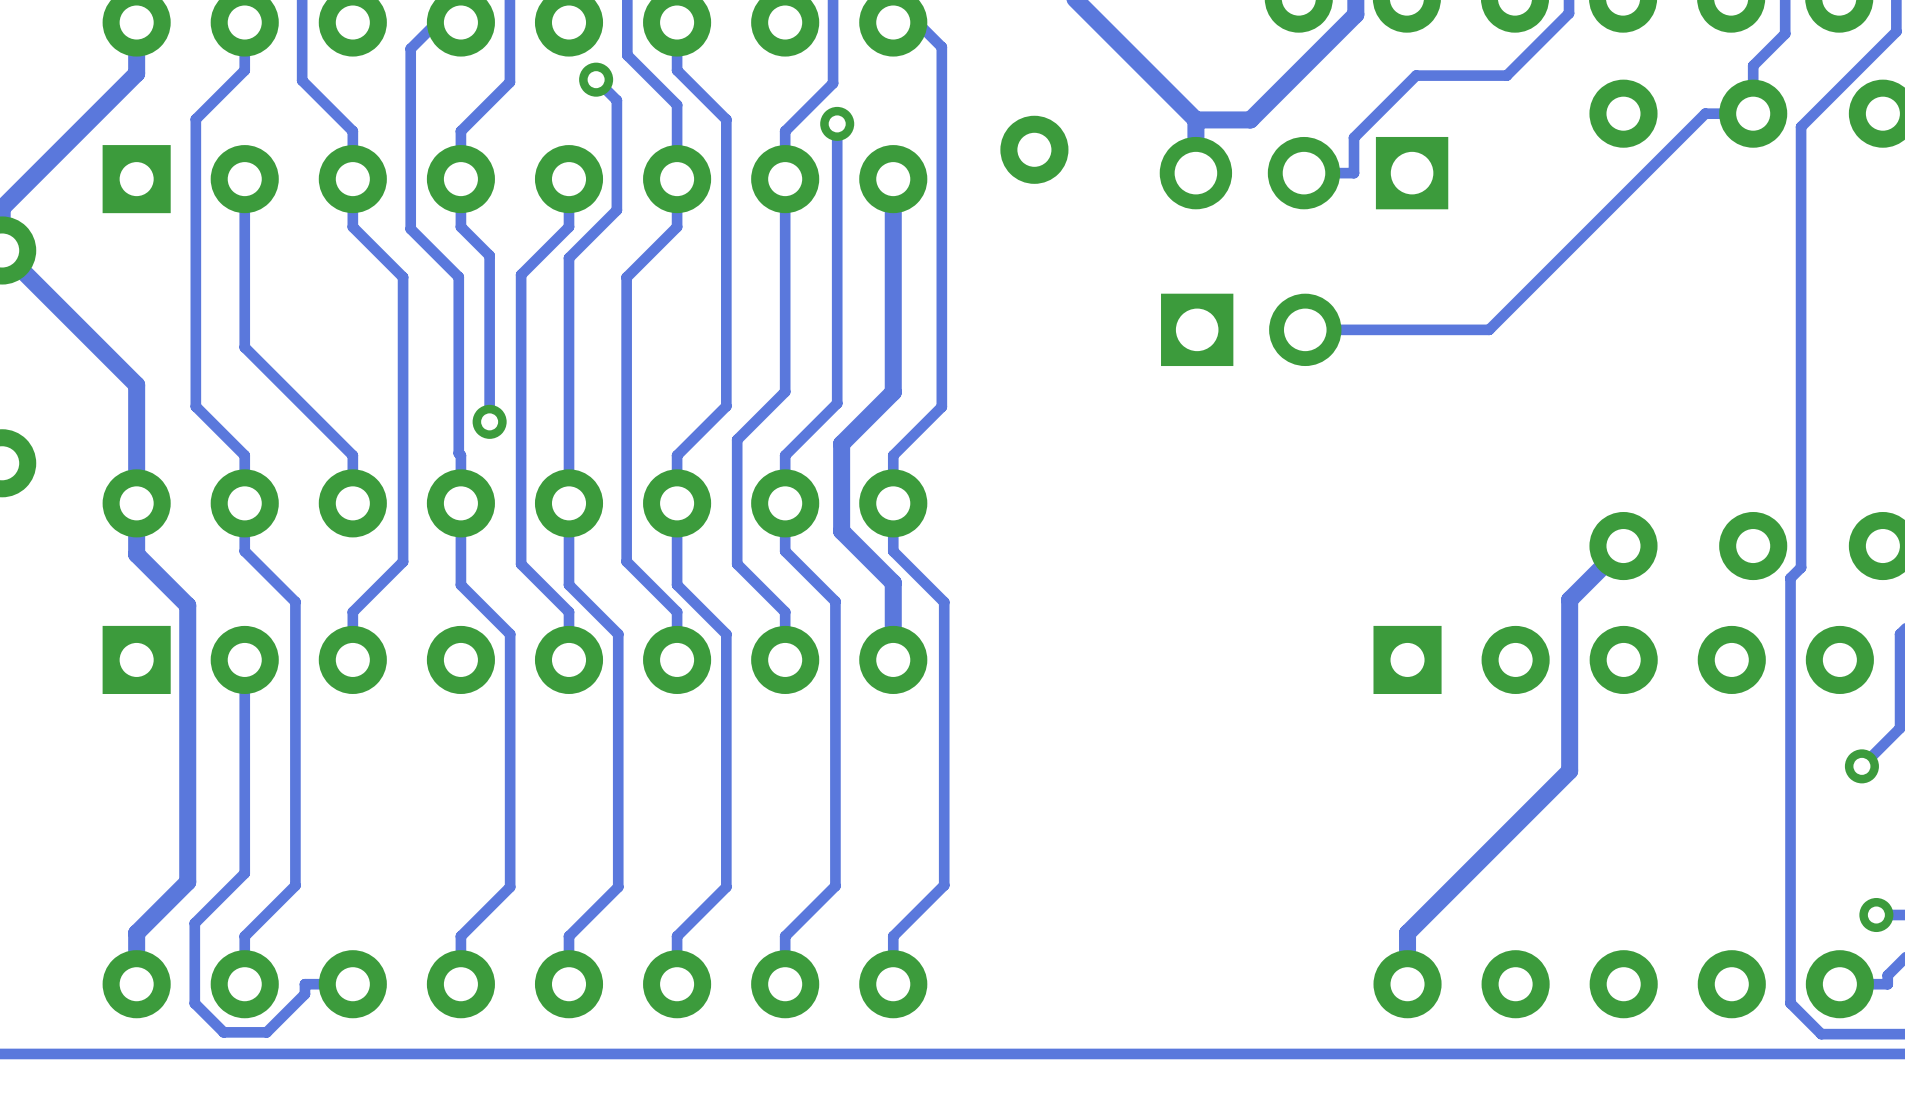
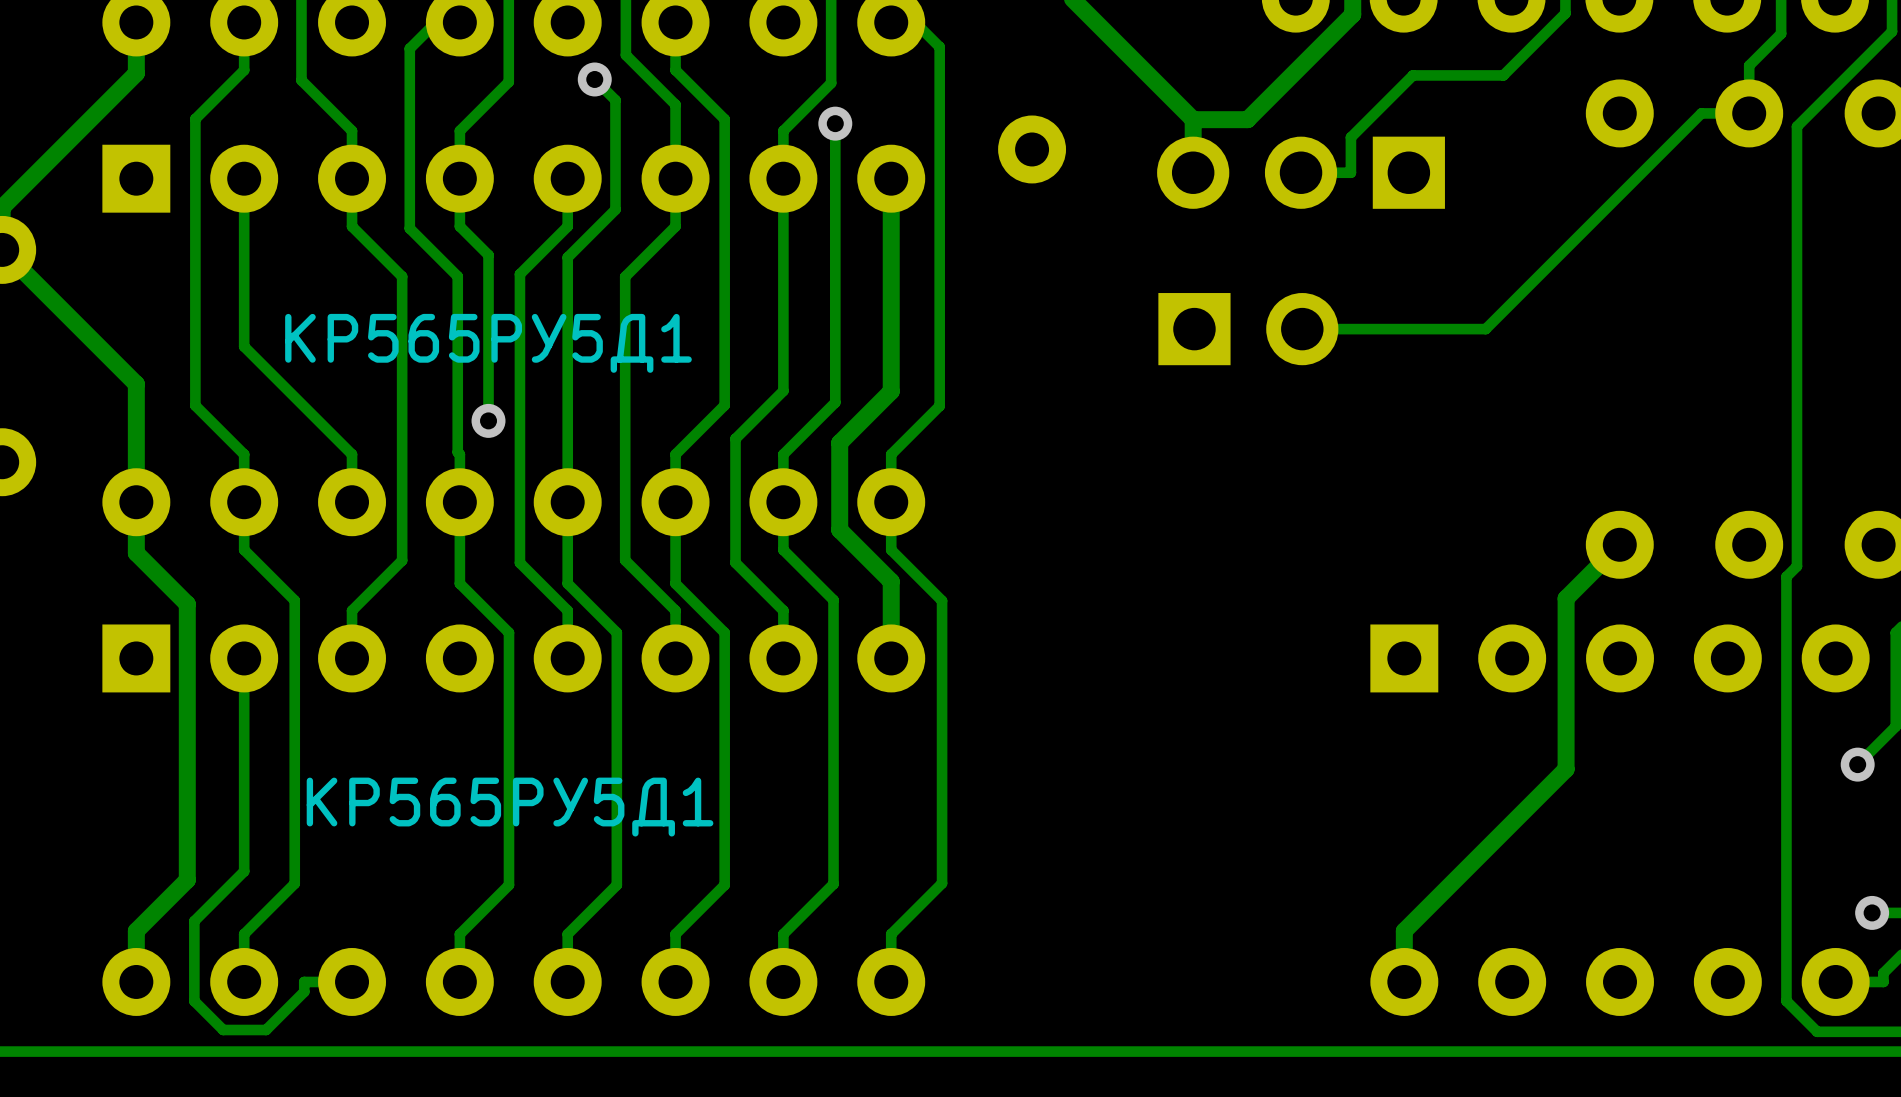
text: none -> КР565РУ5Д1 (488, 343)
text: none -> КР565РУ5Д1 (510, 807)

